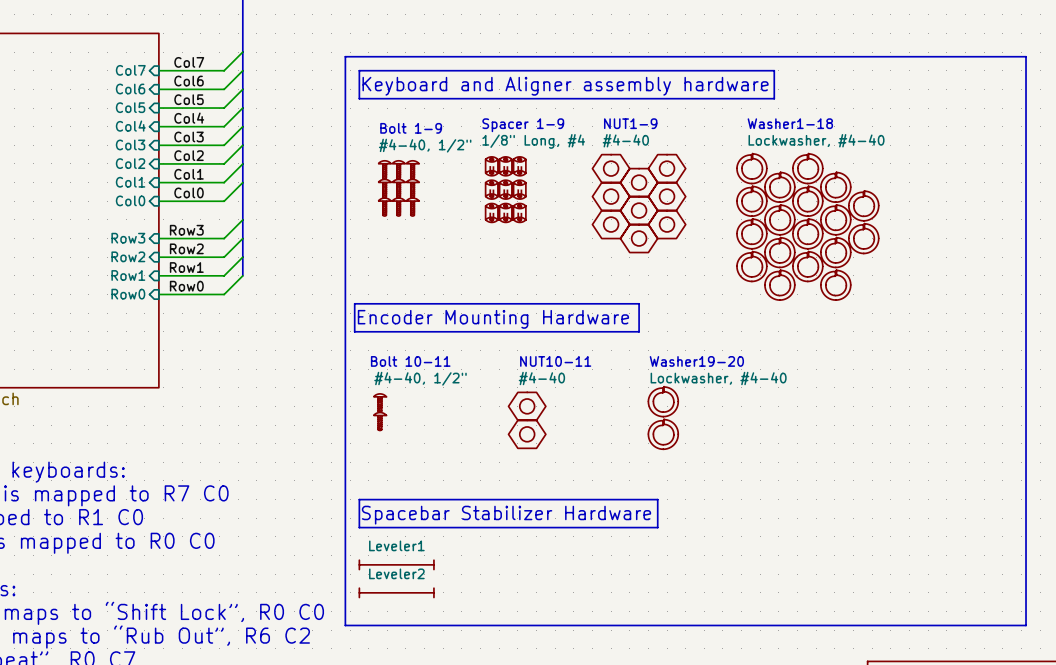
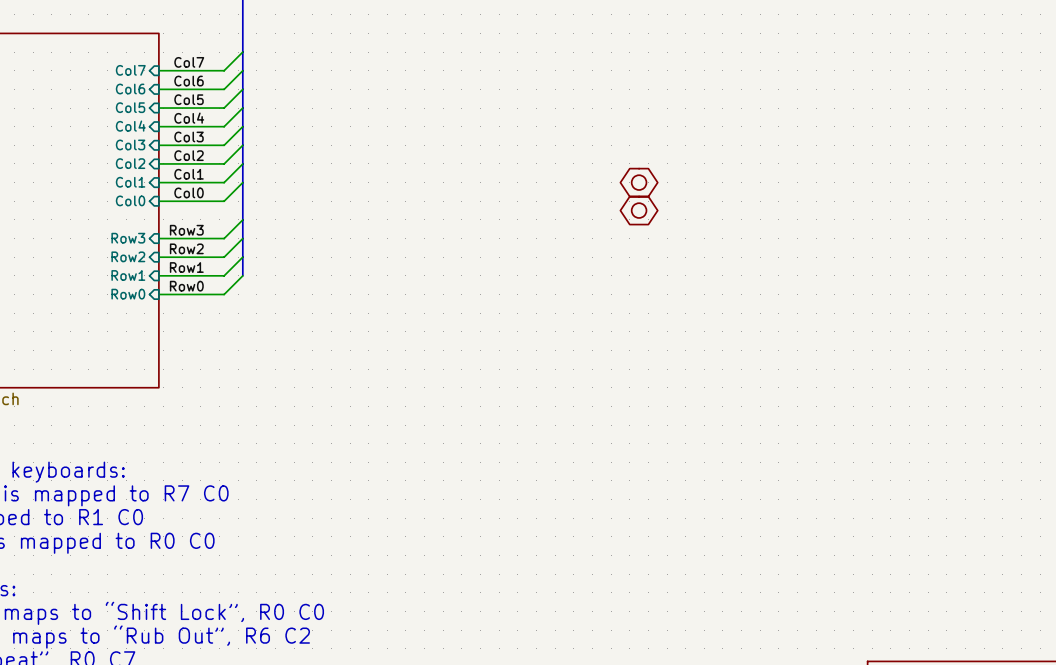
line: (345, 56) (1026, 56) (1026, 625) (345, 625) (345, 56) -> none
line: (359, 70) (774, 70) (774, 98) (359, 98) (359, 70) -> none
text: Keyboard and Aligner assembly hardware (565, 86) -> none
text: NUT1-9 (630, 123) -> none
text: Washer1-18 (790, 123) -> none
text: Spacer 1-9 (523, 125) -> none
text: Bolt 1-9 (411, 128) -> none
part: (491, 166) -> none
part: (505, 166) -> none
part: (519, 166) -> none
part: (611, 168) -> none
part: (667, 168) -> none
part: (751, 168) -> none
part: (807, 168) -> none
part: (384, 169) -> none
part: (398, 169) -> none
part: (412, 169) -> none
part: (779, 187) -> none
part: (835, 187) -> none
part: (384, 188) -> none
part: (398, 188) -> none
part: (412, 188) -> none
part: (491, 189) -> none
part: (505, 189) -> none
part: (519, 189) -> none
part: (611, 196) -> none
part: (667, 196) -> none
part: (751, 201) -> none
part: (807, 201) -> none
part: (863, 205) -> none
part: (384, 207) -> none
part: (398, 207) -> none
part: (412, 207) -> none
part: (491, 212) -> none
part: (505, 212) -> none
part: (519, 212) -> none
part: (779, 219) -> none
part: (835, 219) -> none
part: (611, 224) -> none
part: (667, 224) -> none
part: (751, 233) -> none
part: (807, 233) -> none
part: (639, 238) -> none
part: (863, 238) -> none
part: (779, 252) -> none
part: (835, 252) -> none
part: (751, 266) -> none
part: (807, 266) -> none
part: (779, 285) -> none
part: (835, 285) -> none
line: (354, 303) (639, 303) (639, 331) (354, 331) (354, 303) -> none
text: Encoder Mounting Hardware (493, 319) -> none
text: Bolt 10-11 (410, 361) -> none
text: NUT10-11 (555, 361) -> none
text: Washer19-20 (696, 361) -> none
part: (663, 401) -> none
part: (380, 402) -> none
part: (527, 406) -> none
part: (380, 421) -> none
part: (527, 434) -> none
part: (663, 434) -> none
line: (359, 499) (359, 527) (657, 527) (657, 499) (359, 499) -> none
text: Spacebar Stabilizer Hardware (506, 515) -> none
Leveler1: (396, 564) -> none
Leveler2: (396, 592) -> none

